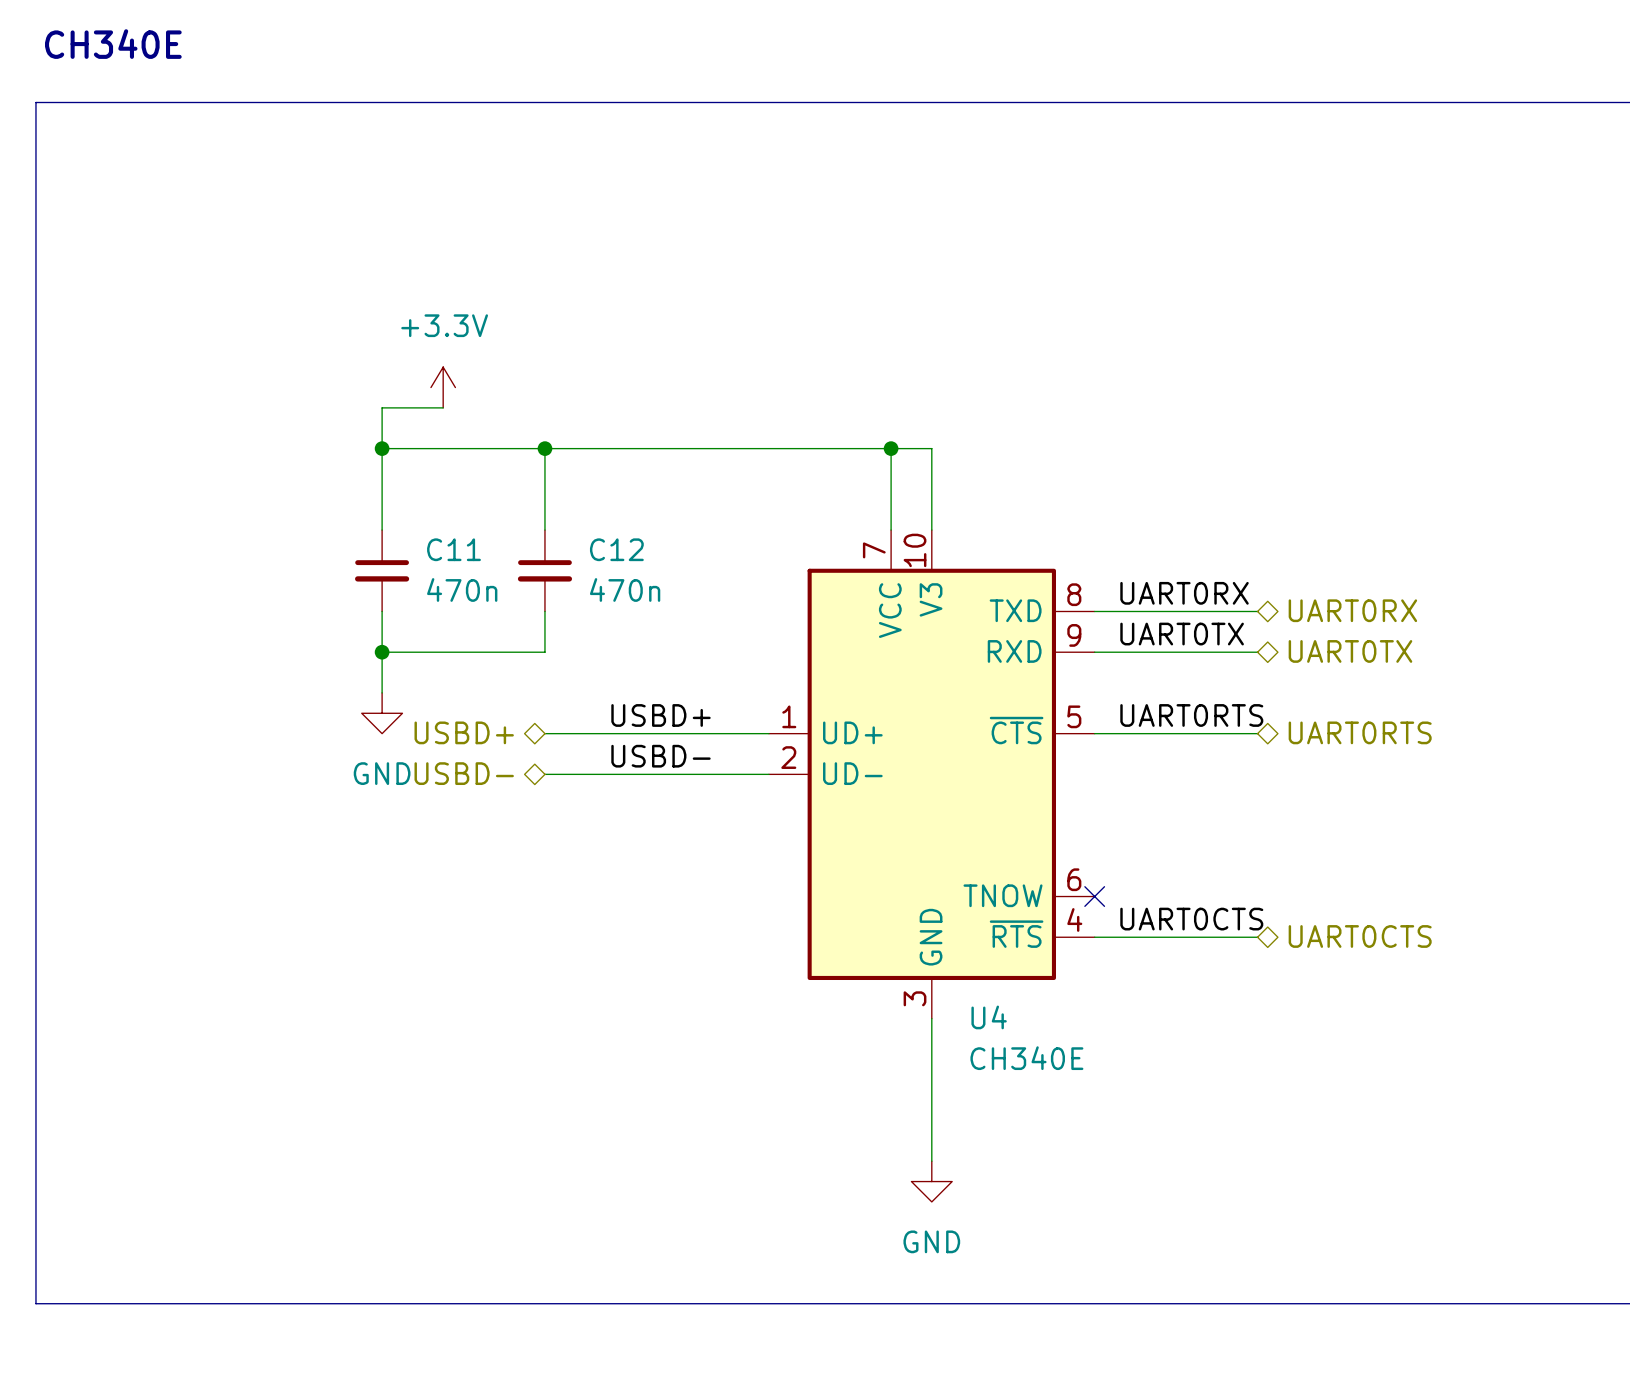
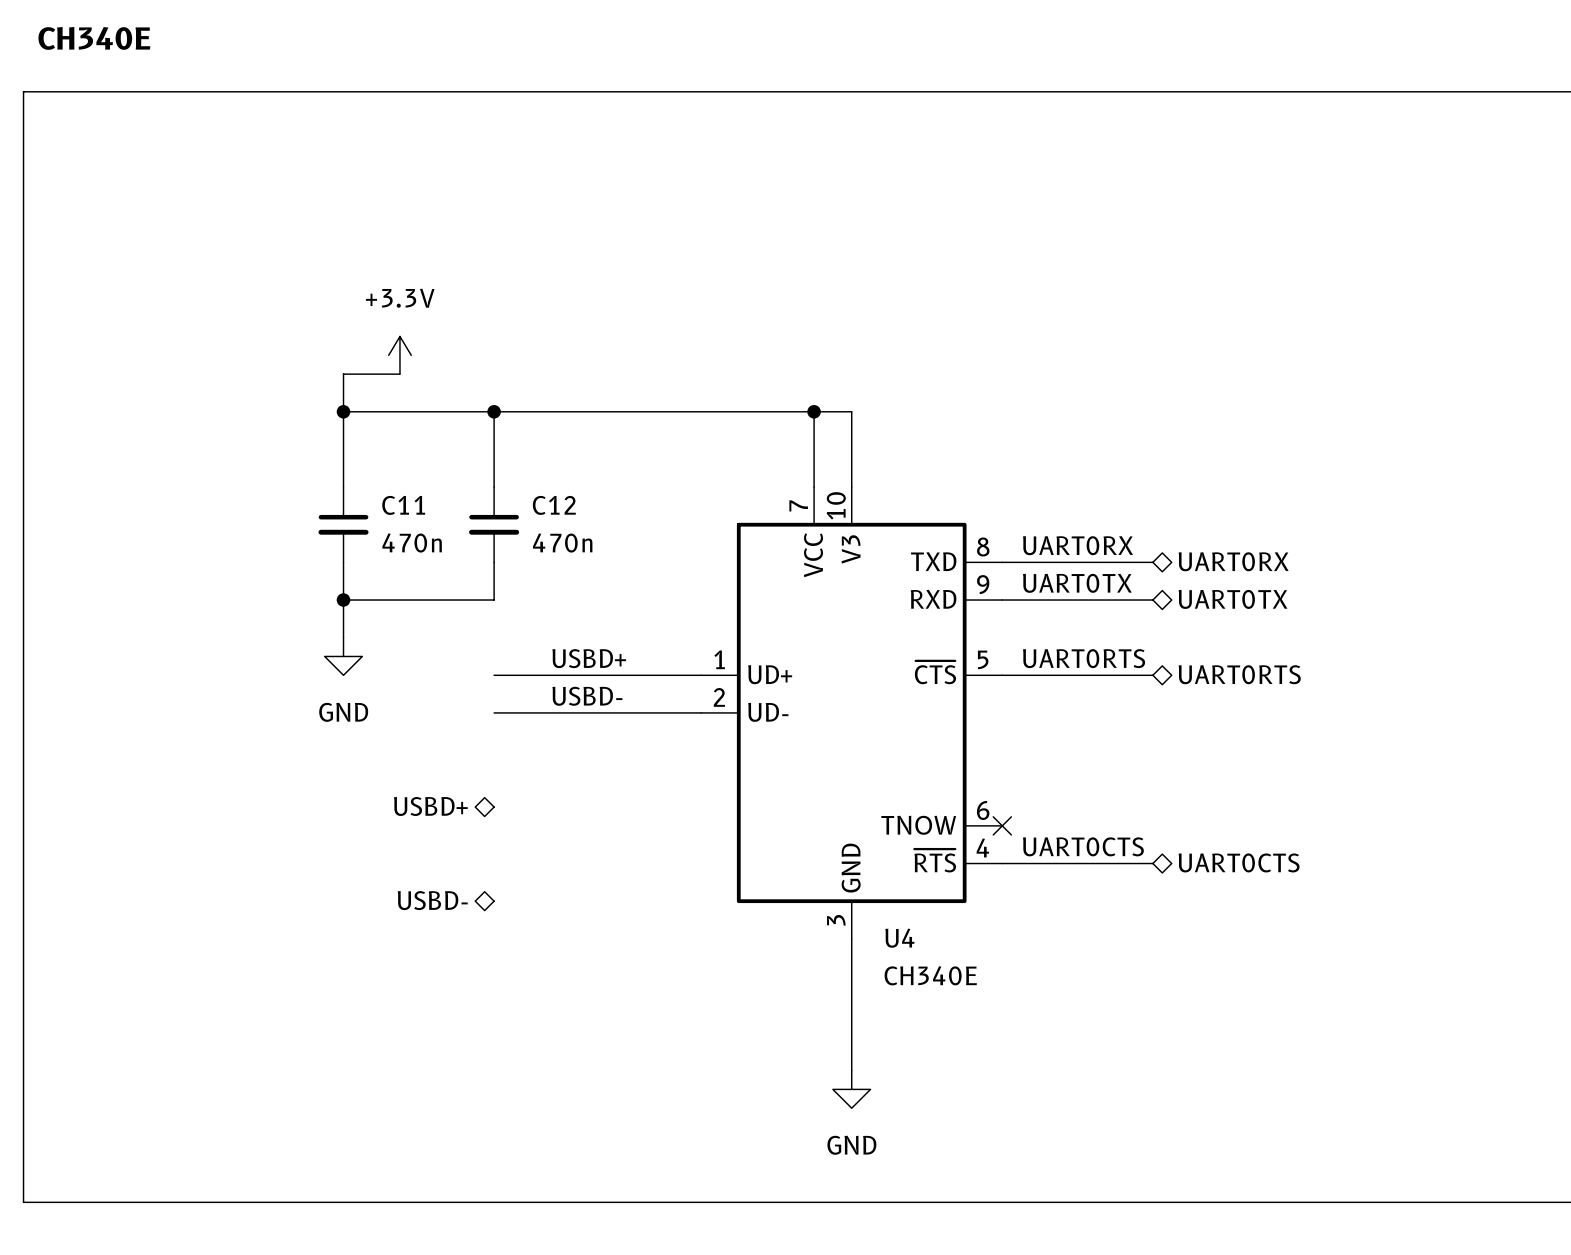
hierarchical label position: USBD+ (464, 732) -> USBD+ (430, 806)
hierarchical label position: USBD- (464, 773) -> USBD- (432, 900)

